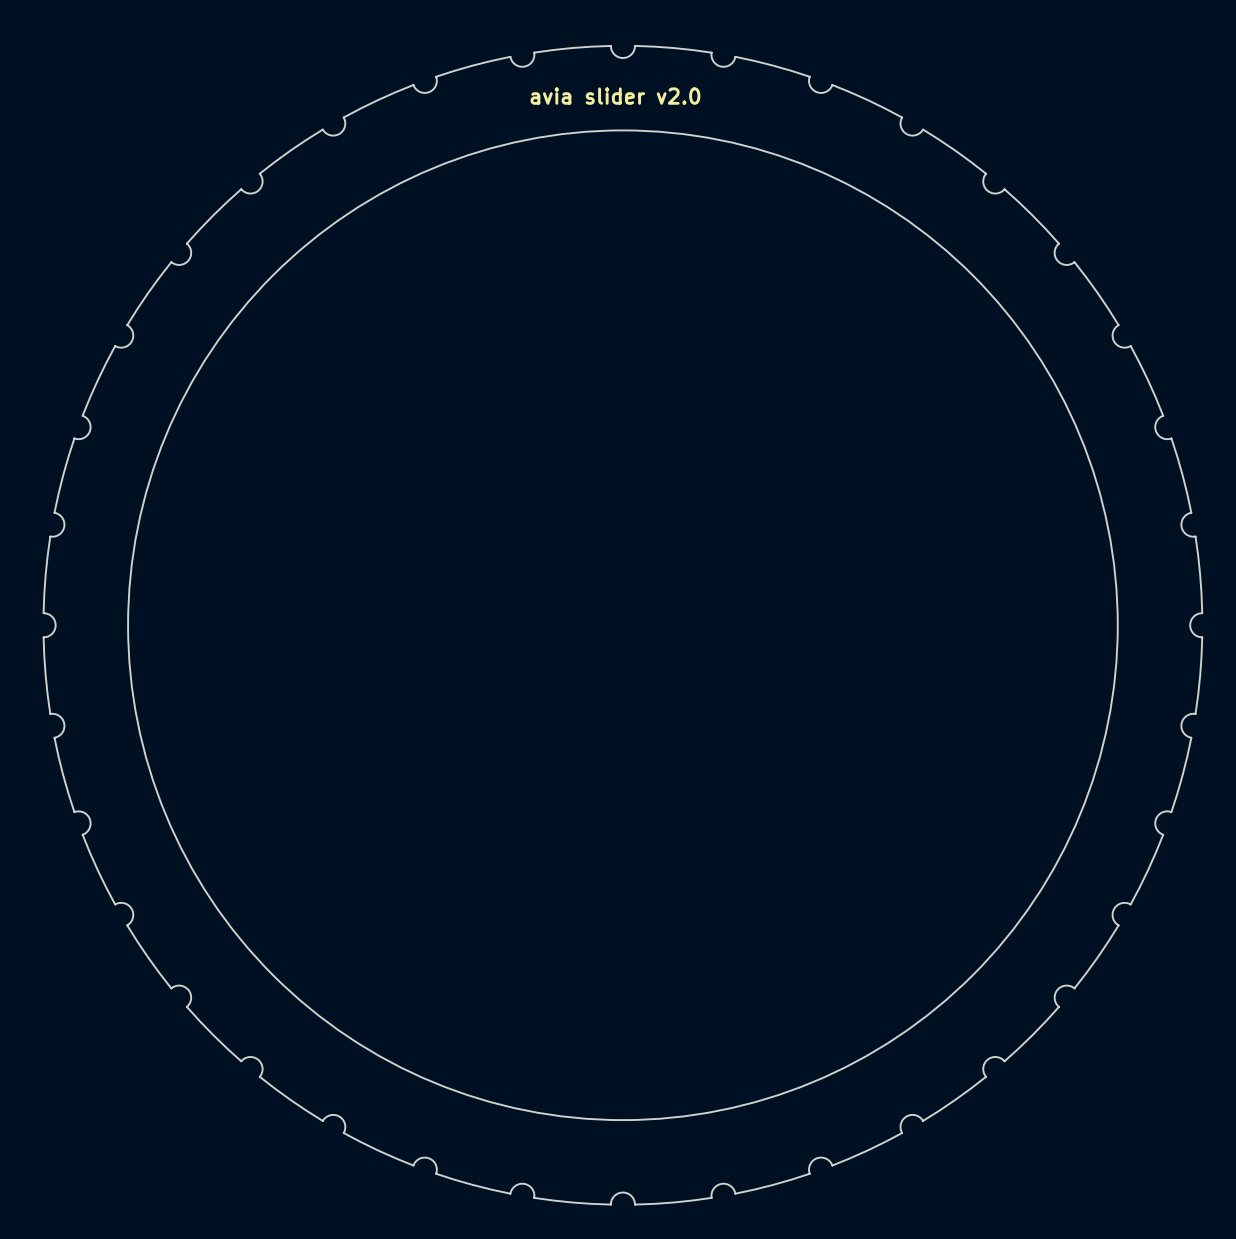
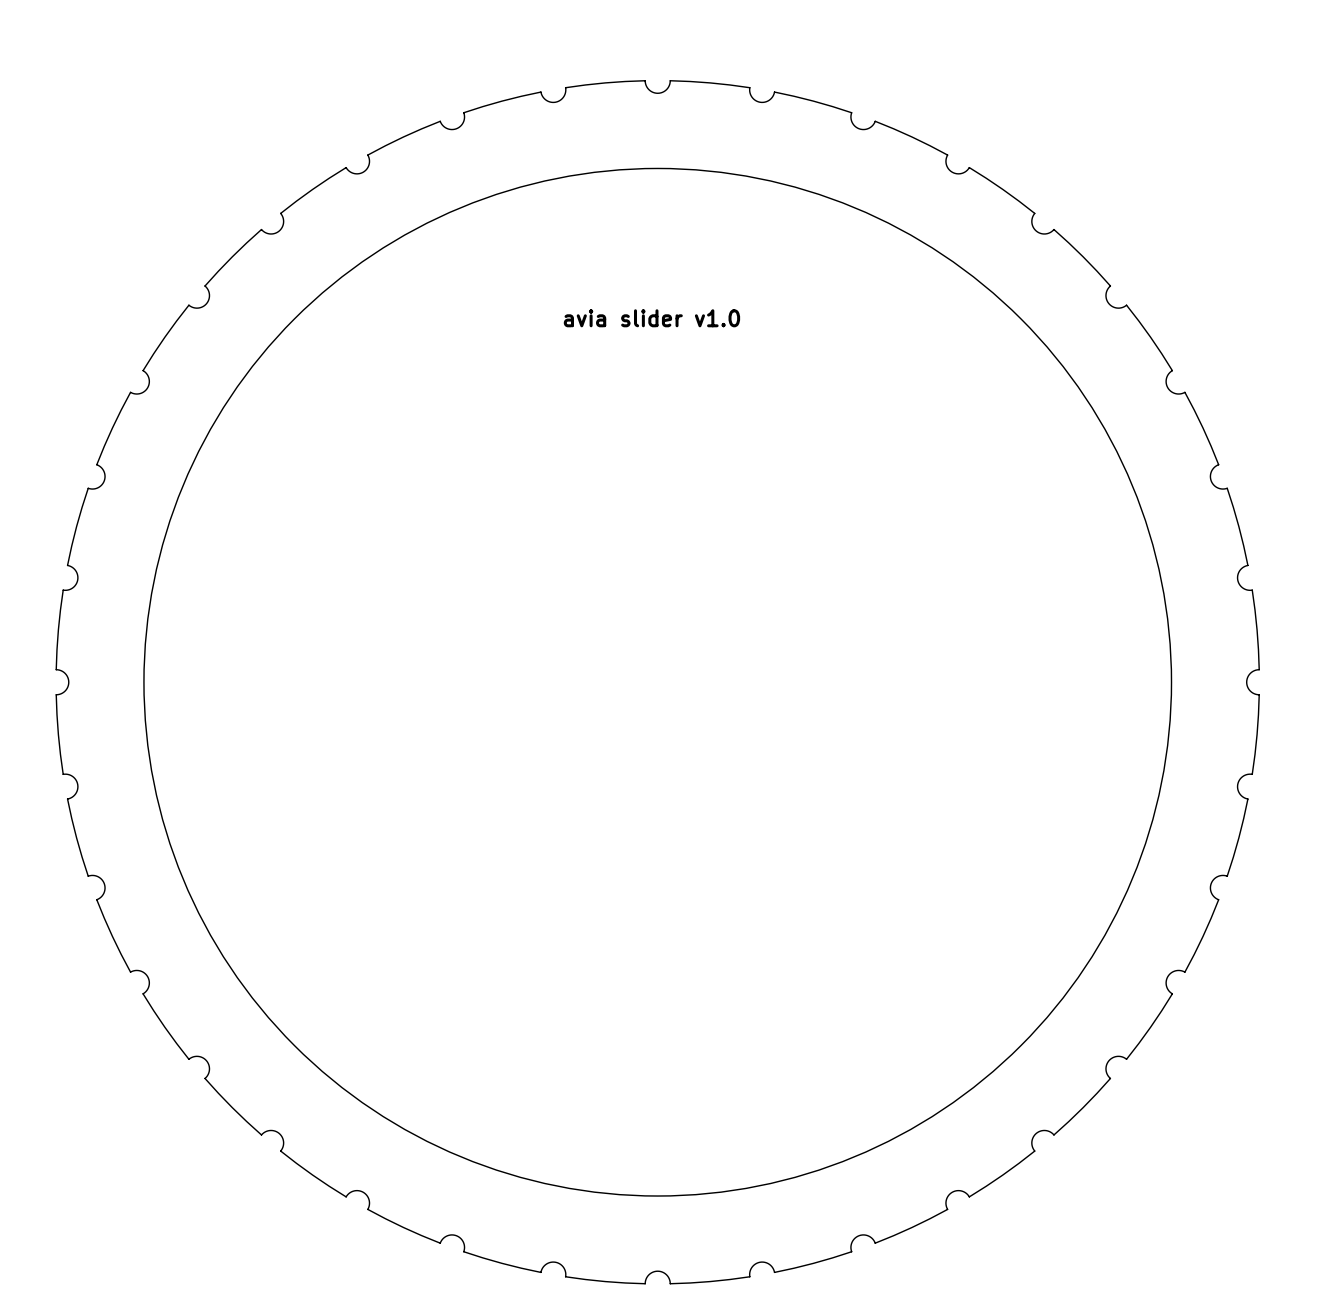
text: avia slider v2.0 (615, 96) -> none
text: none -> avia slider v1.0 (651, 318)

